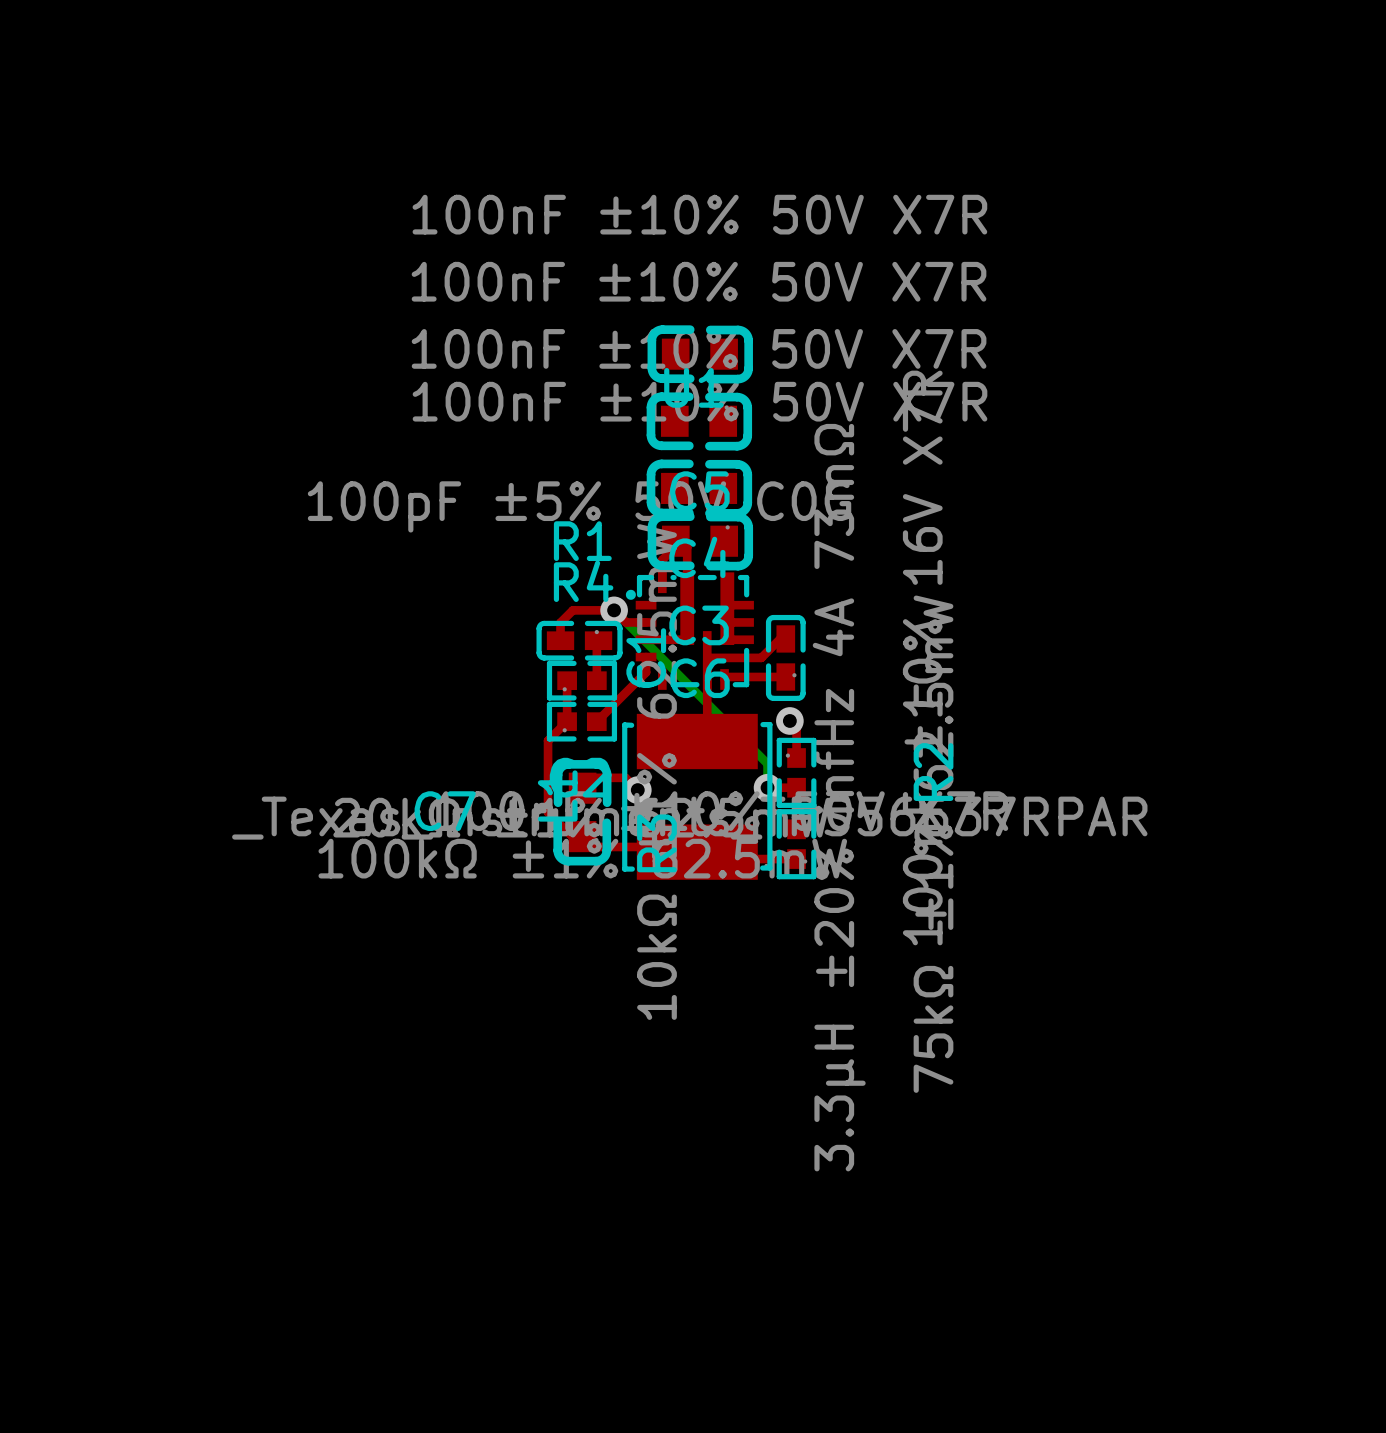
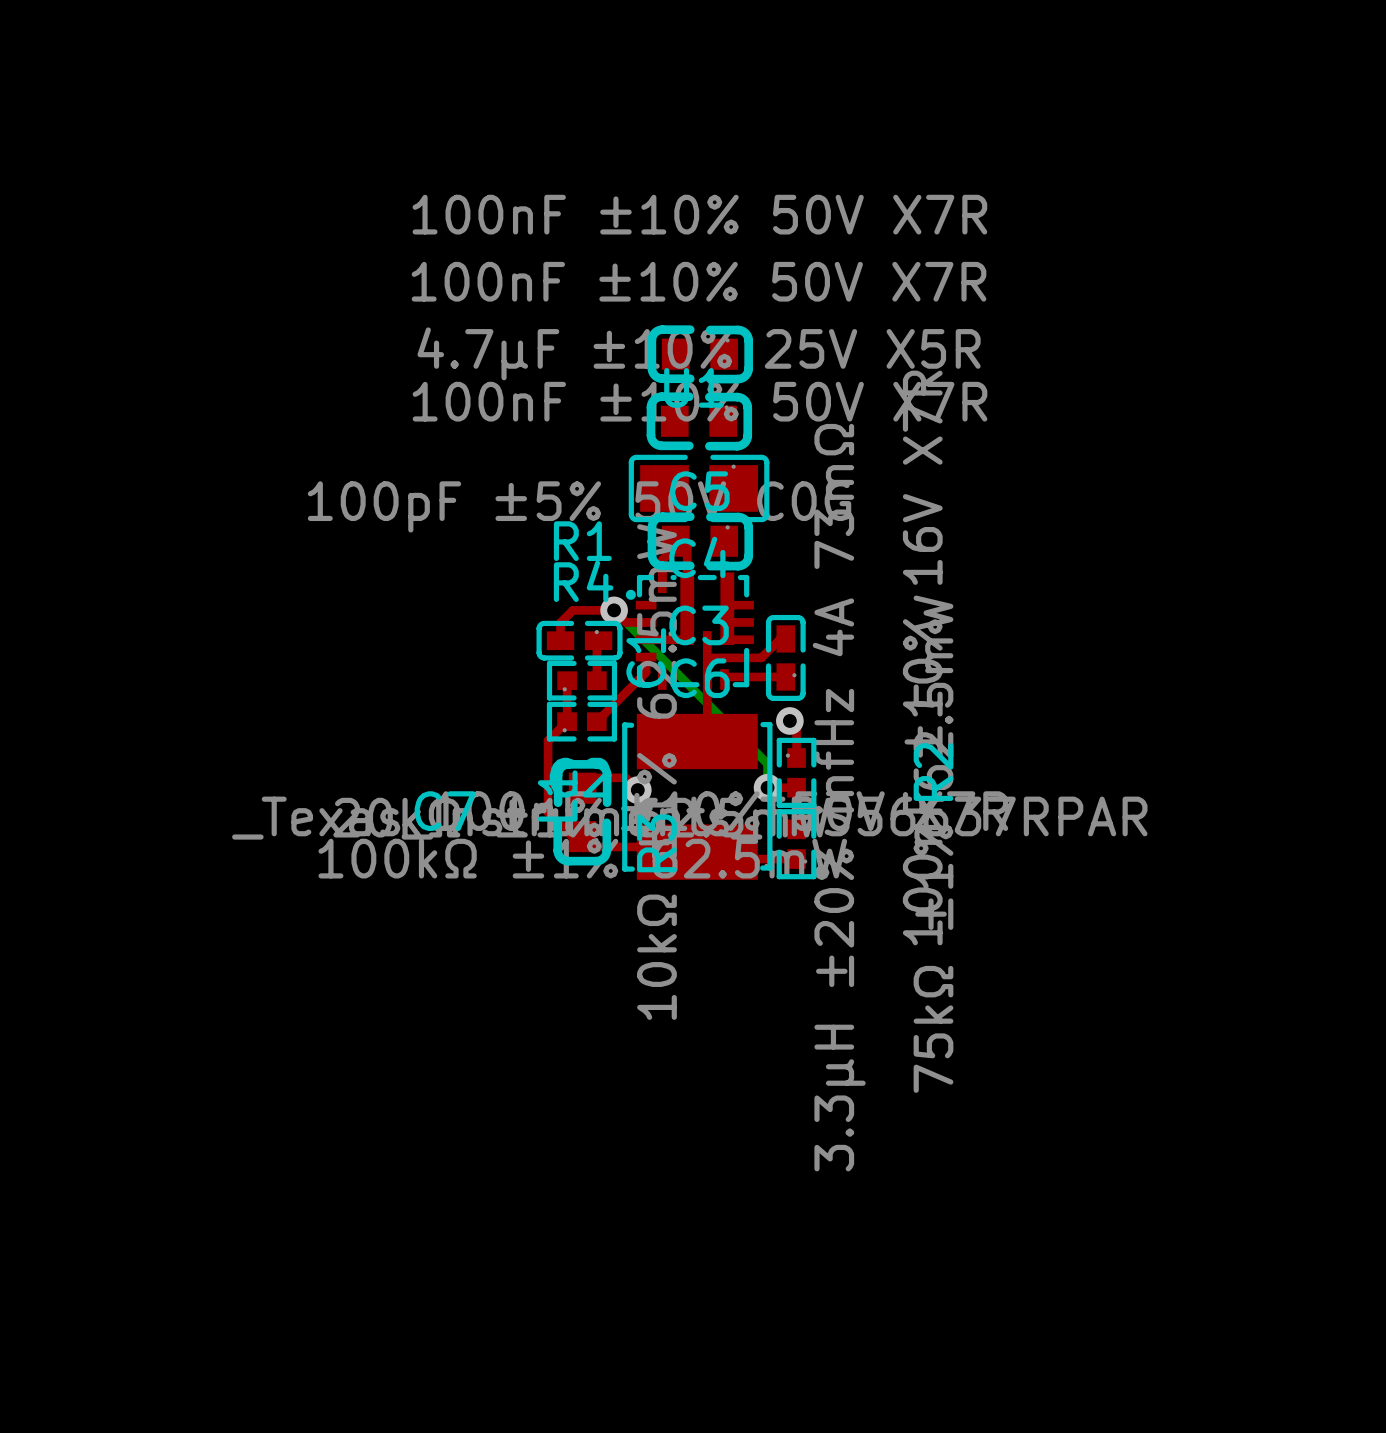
C3 value: 100nF ±10% 50V X7R (699, 348) -> 4.7µF ±10% 25V X5R (699, 353)
C3 footprint: [646, 459, 753, 518] -> [628, 454, 770, 523]

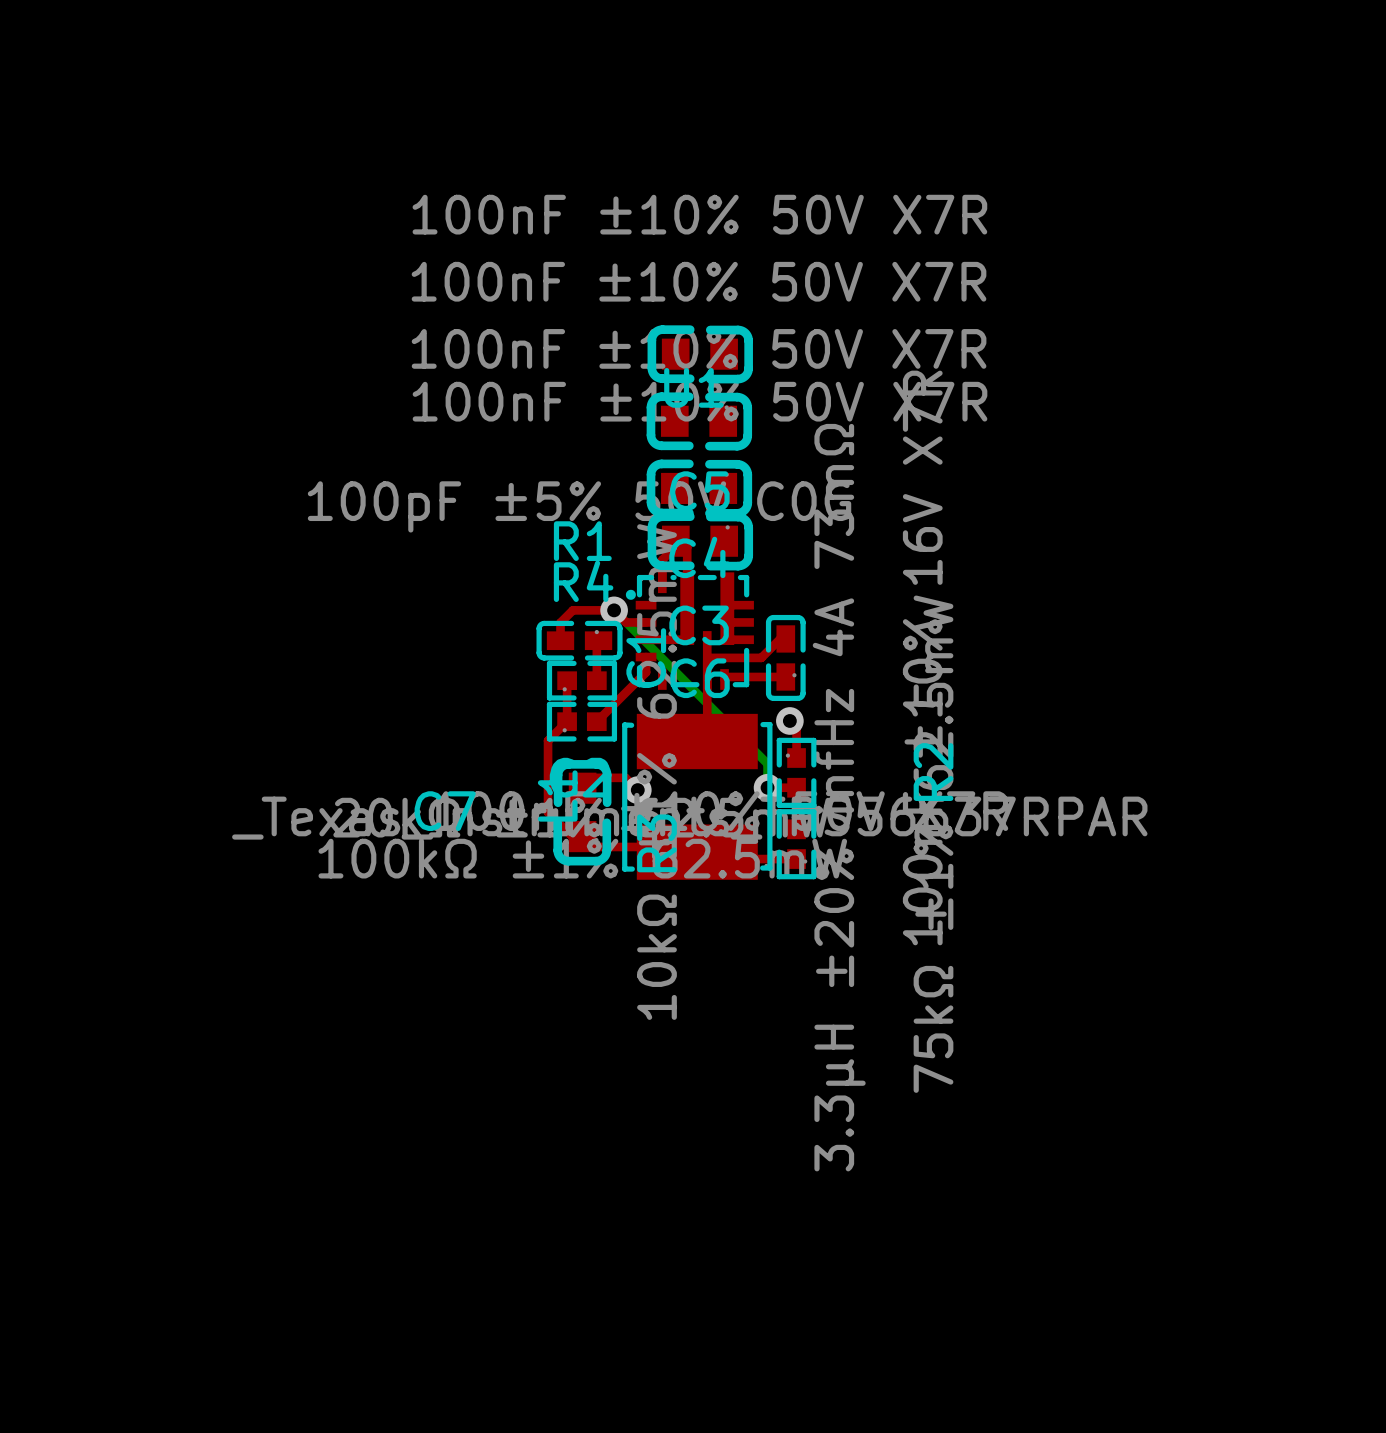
C3 value: 4.7µF ±10% 25V X5R (699, 353) -> 100nF ±10% 50V X7R (699, 348)
C3 footprint: [628, 454, 770, 523] -> [646, 459, 753, 518]

